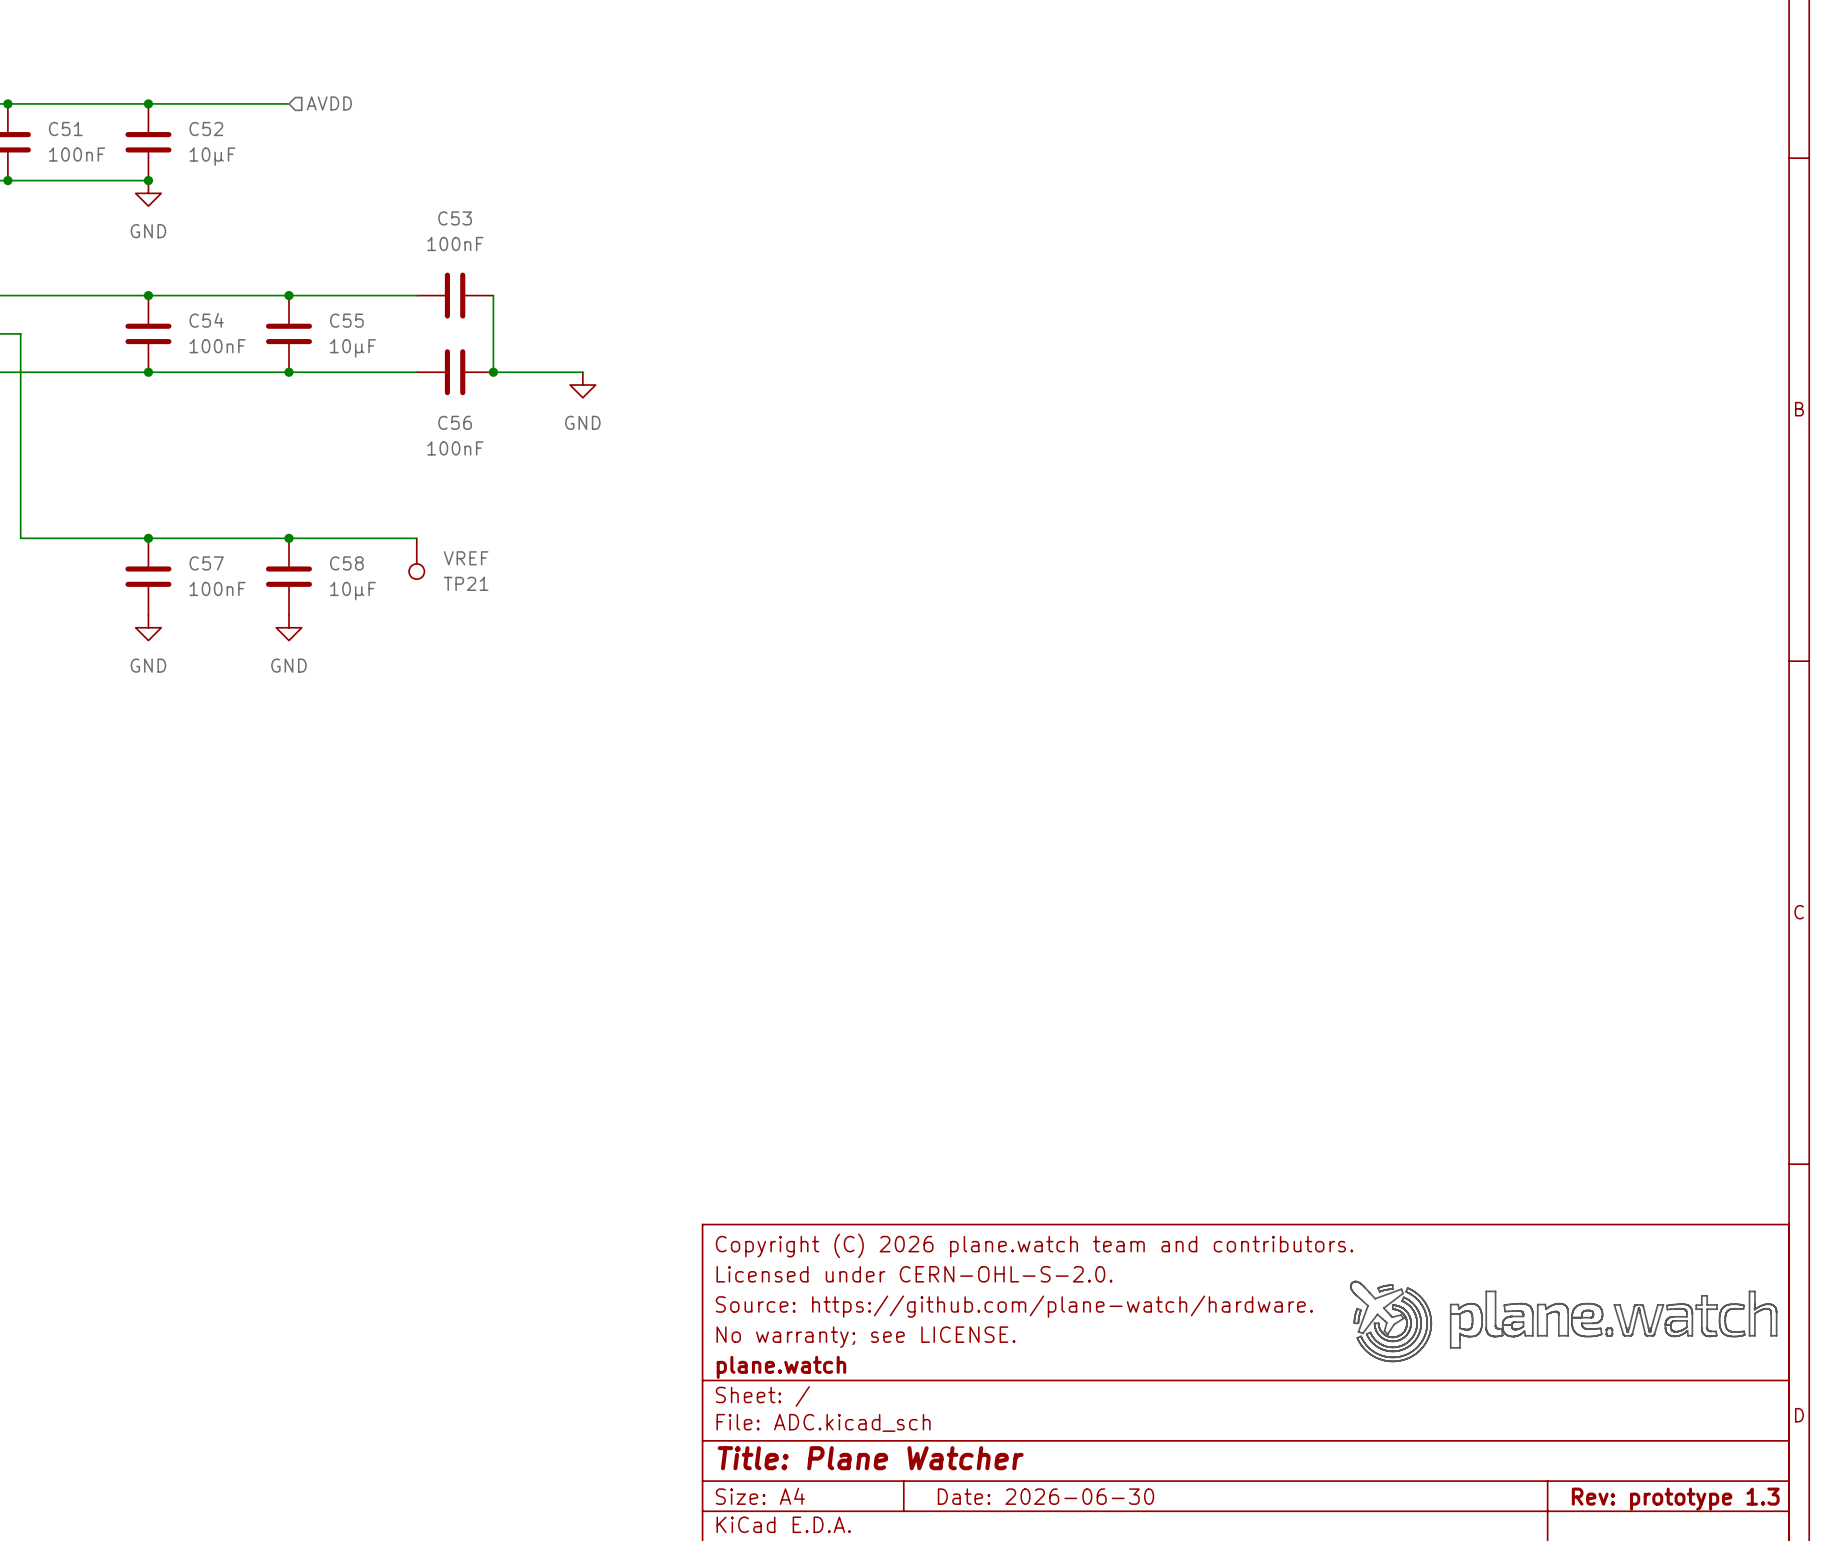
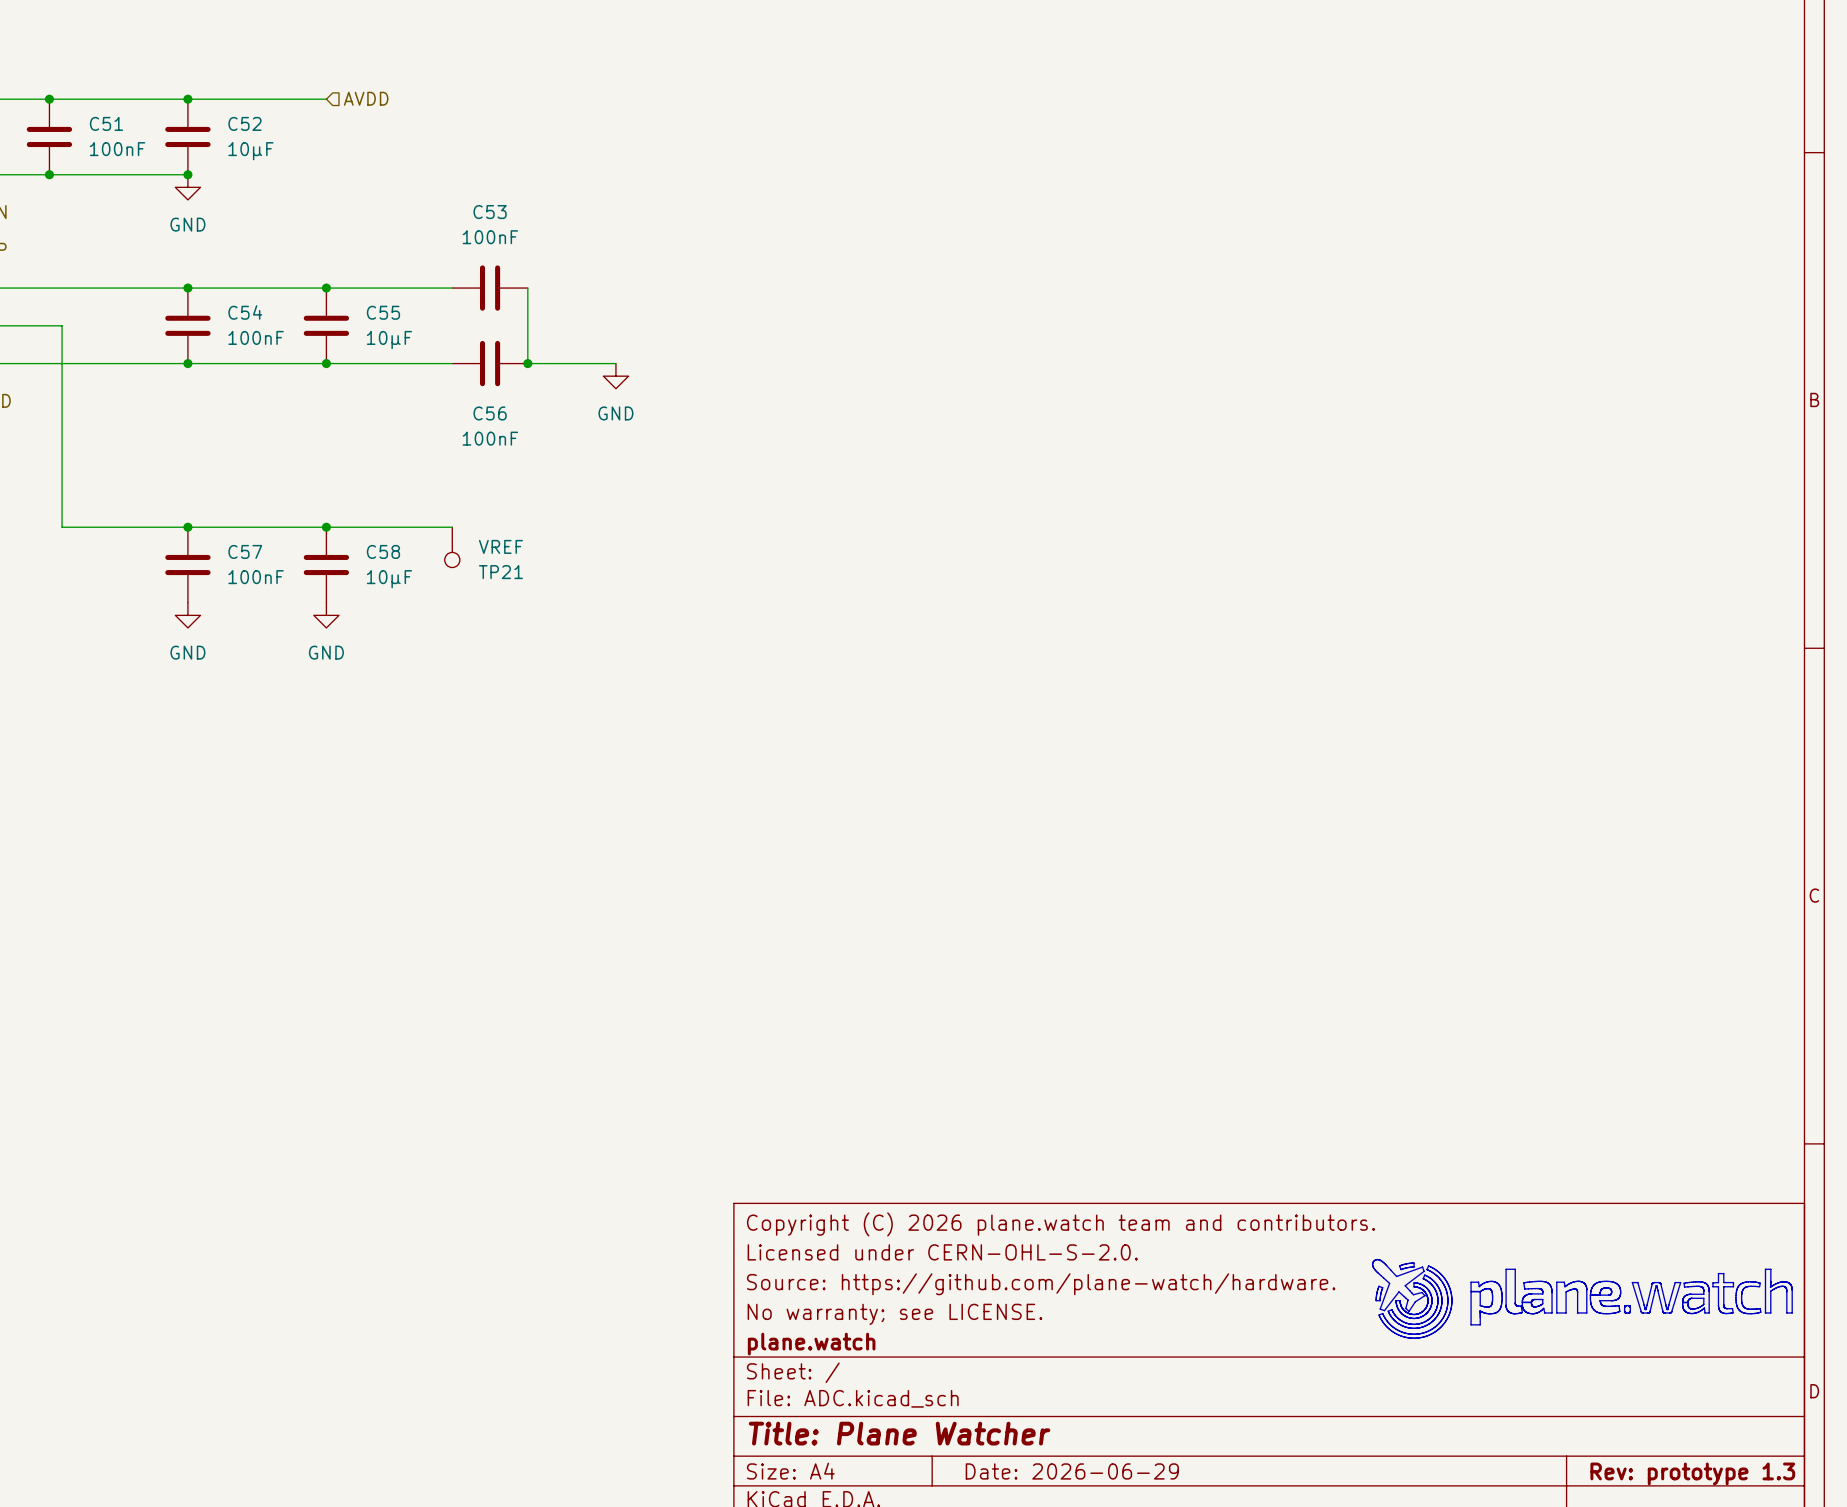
title block: Date: 2026-06-30 (1045, 1496) -> Date: 2026-06-29 (1072, 1471)

